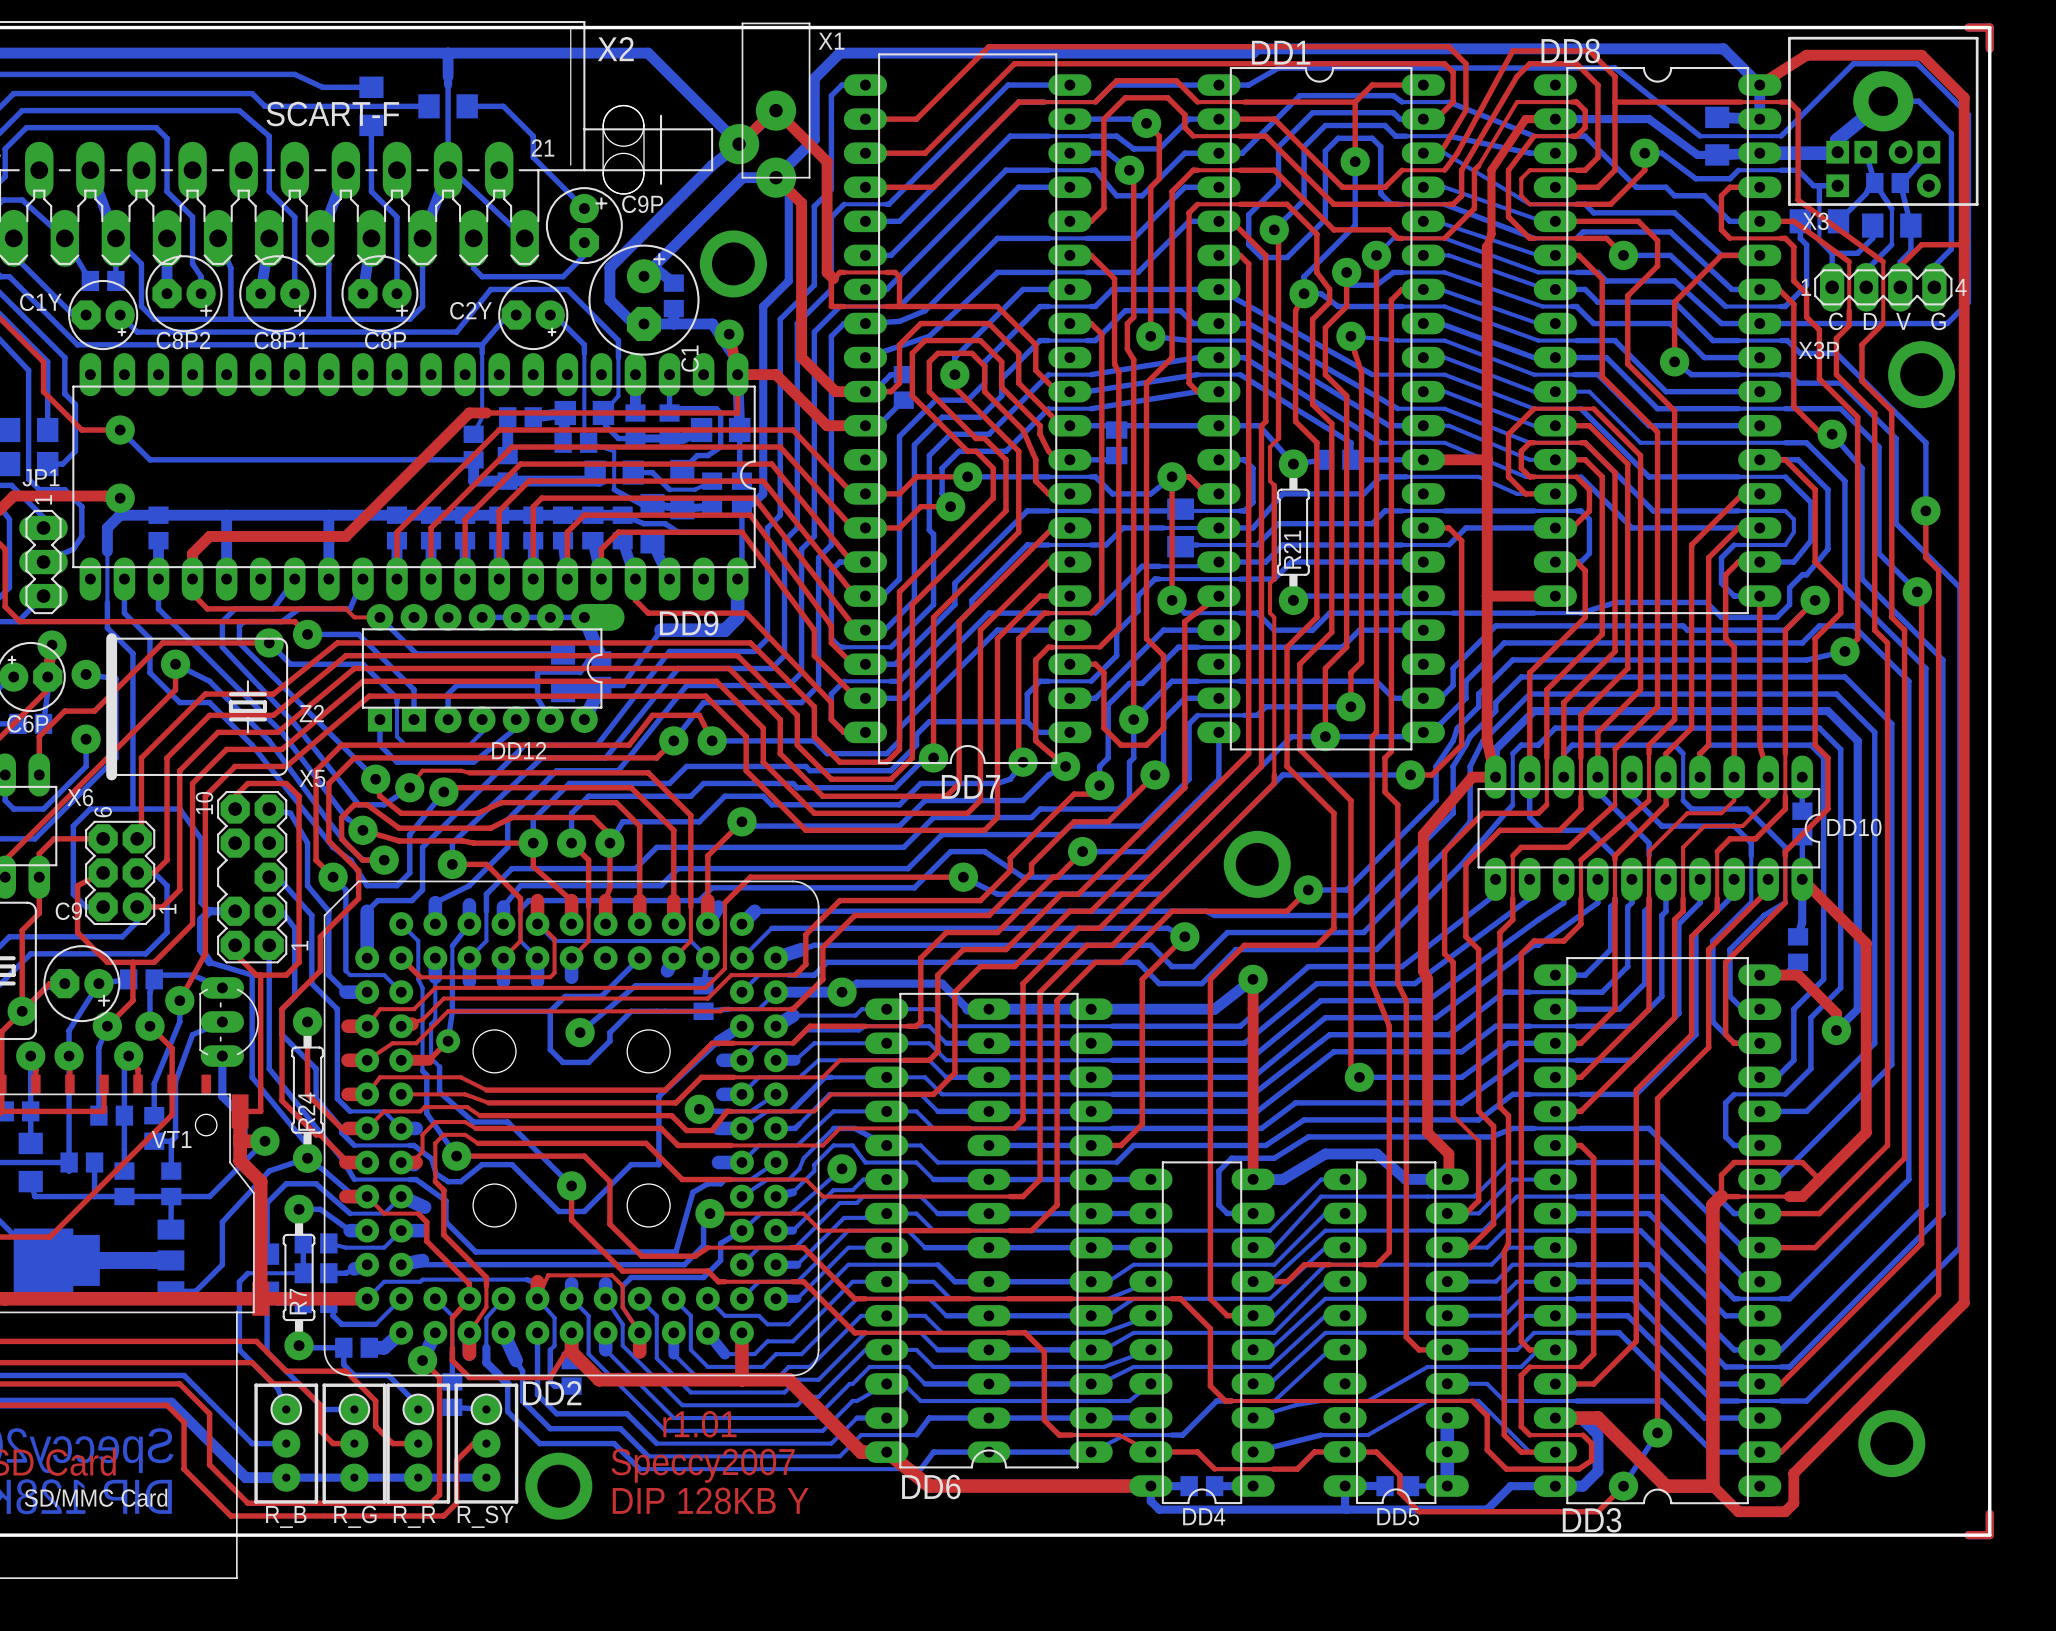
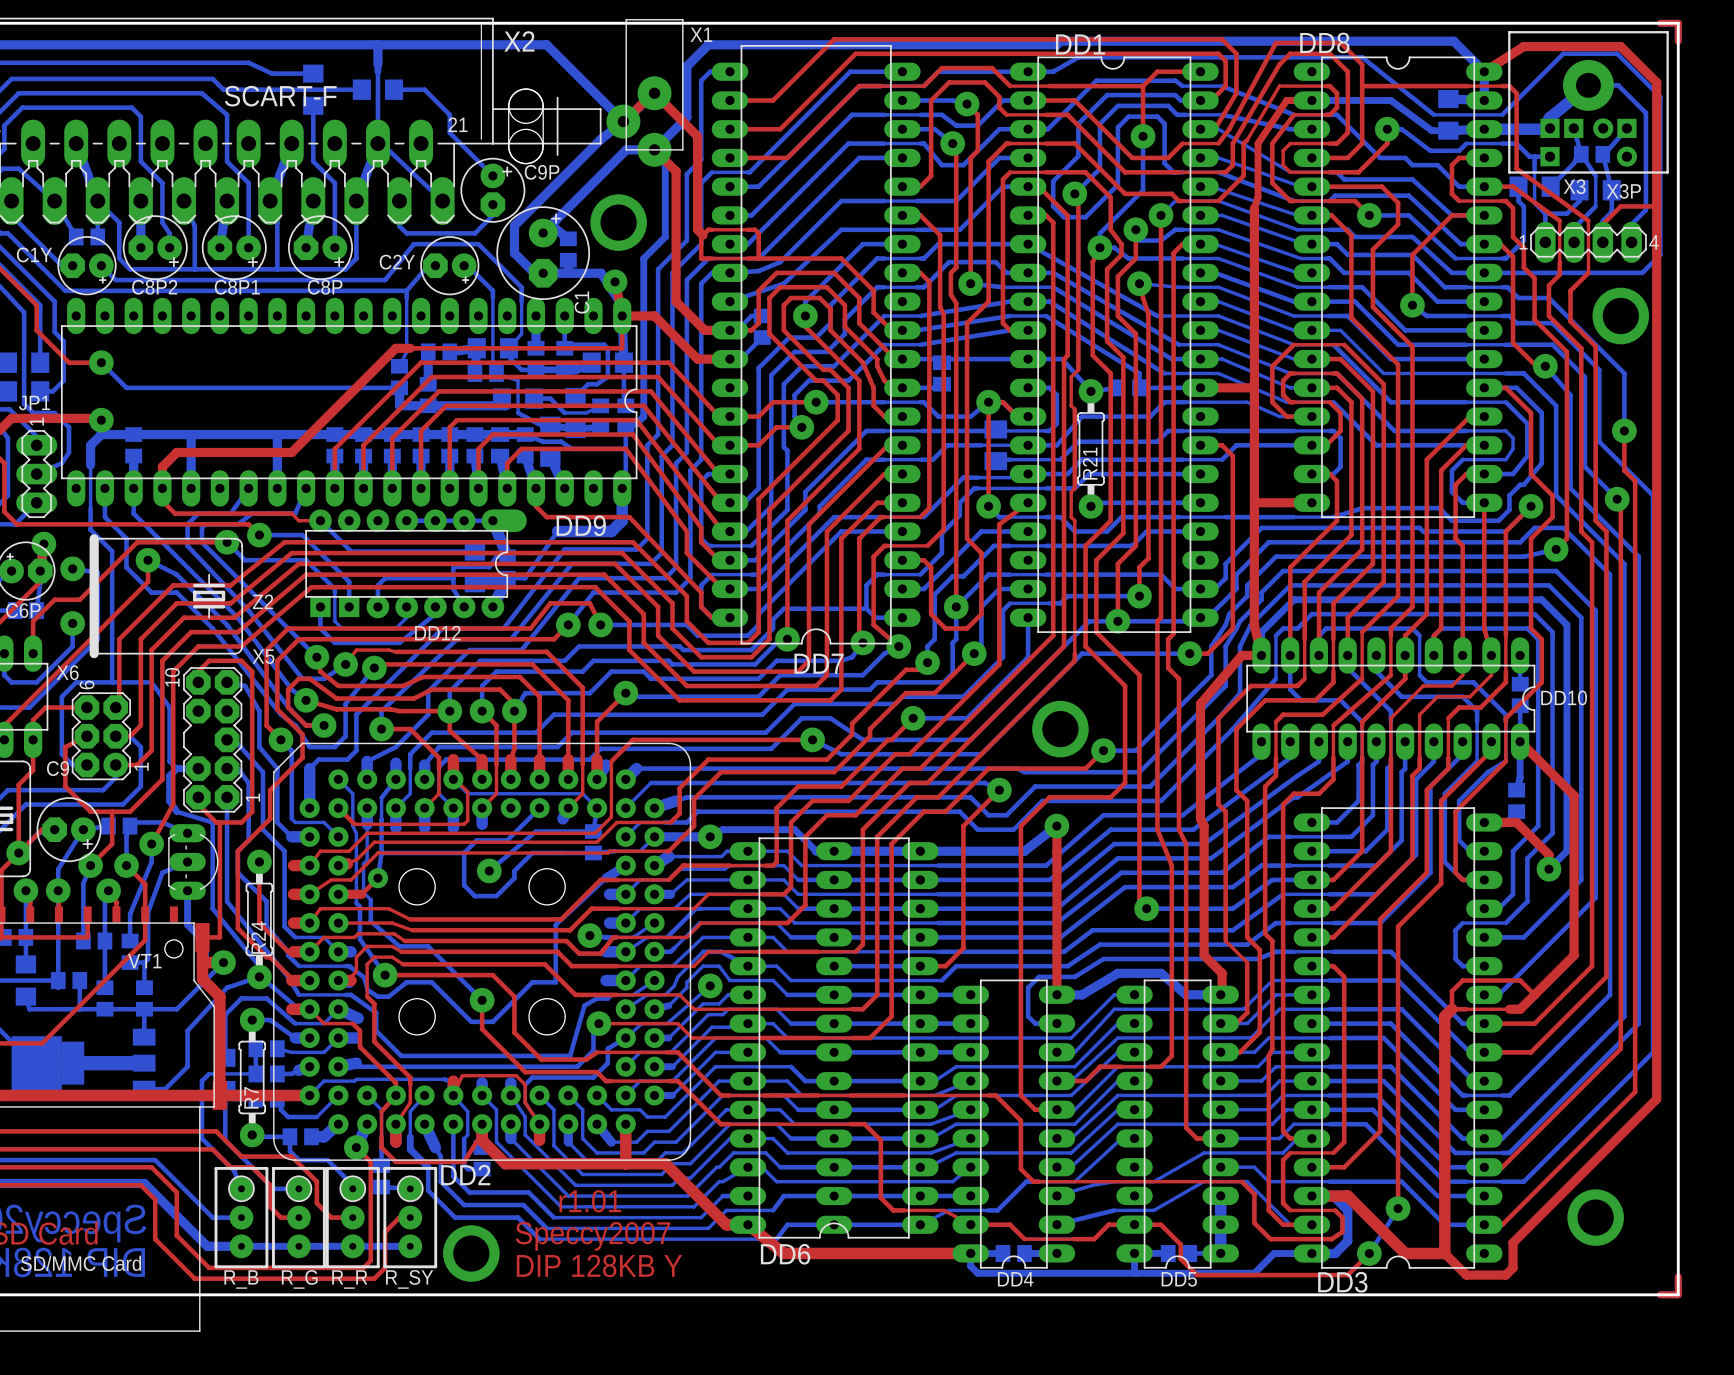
X3 name position: X3 (1815, 221) -> X3 (1574, 186)
text: C (1836, 321) -> none
text: D (1870, 321) -> none
text: V (1903, 321) -> none
text: G (1938, 321) -> none
X3P name position: X3P (1818, 350) -> X3P (1623, 191)

